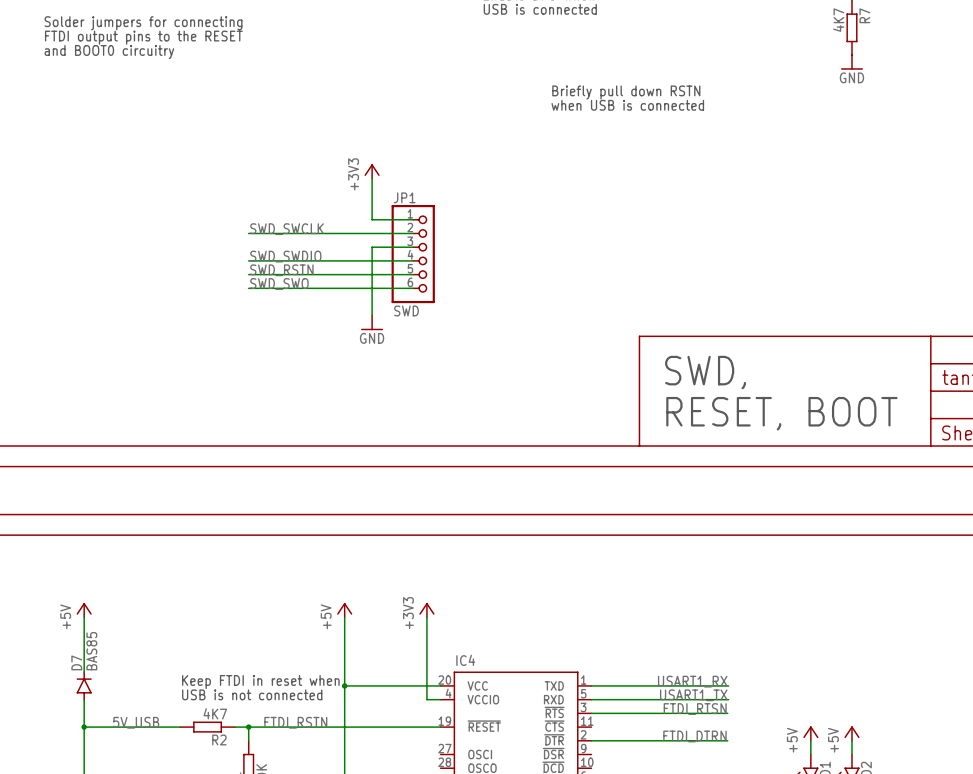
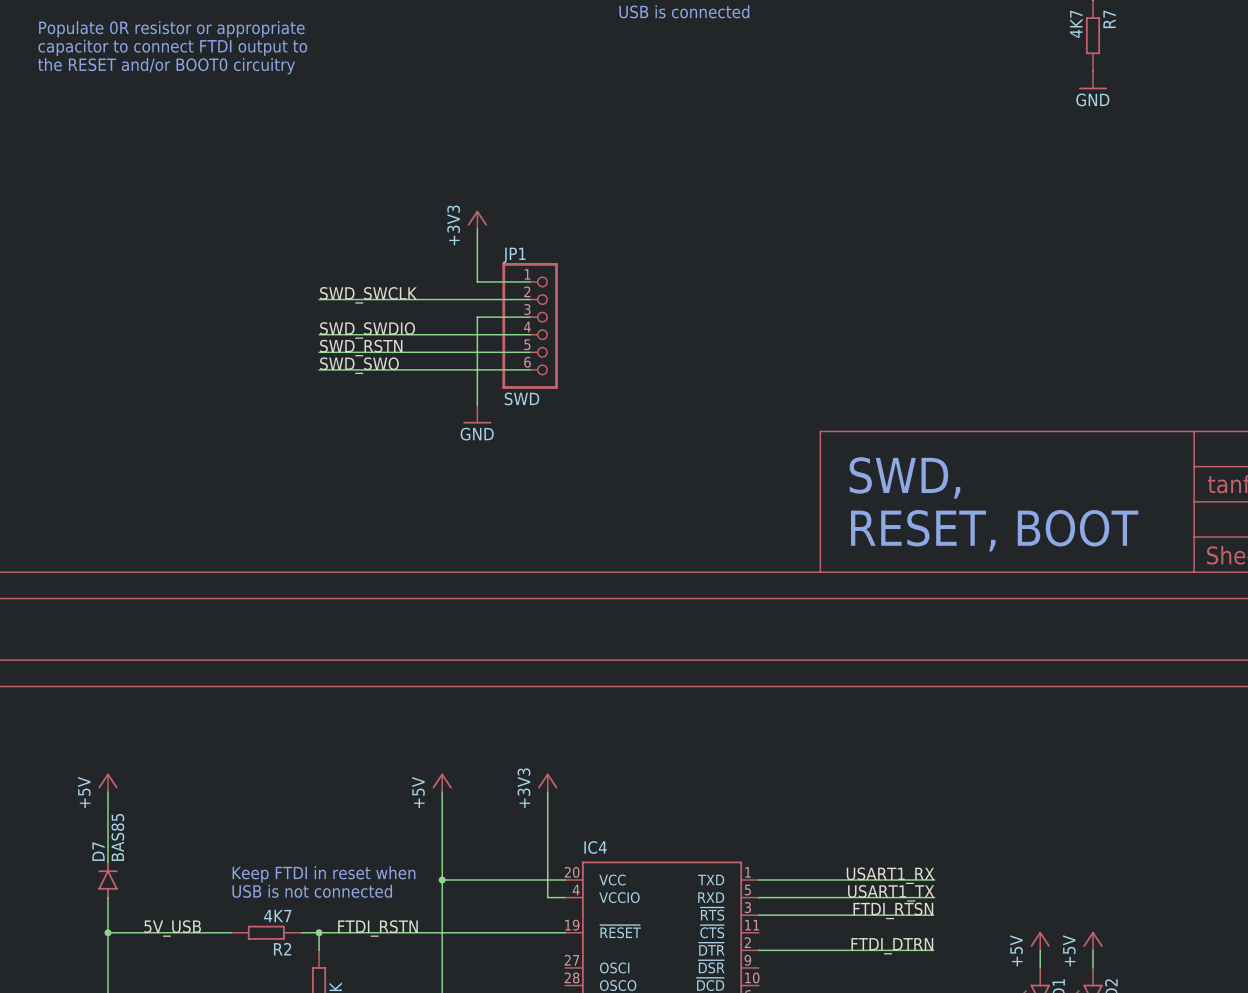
text: Solder jumpers for connecting (143, 23) -> none
text: none -> Populate 0R resistor or appropriate (171, 29)
text: FTDI output pins to the RESET (143, 37) -> none
text: none -> capacitor to connect FTDI output to (172, 47)
text: and BOOT0 circuitry (109, 52) -> the RESET and/or BOOT0 circuitry (166, 66)
text: Briefly pull down RSTN (626, 92) -> none
text: when USB is connected (627, 105) -> none

